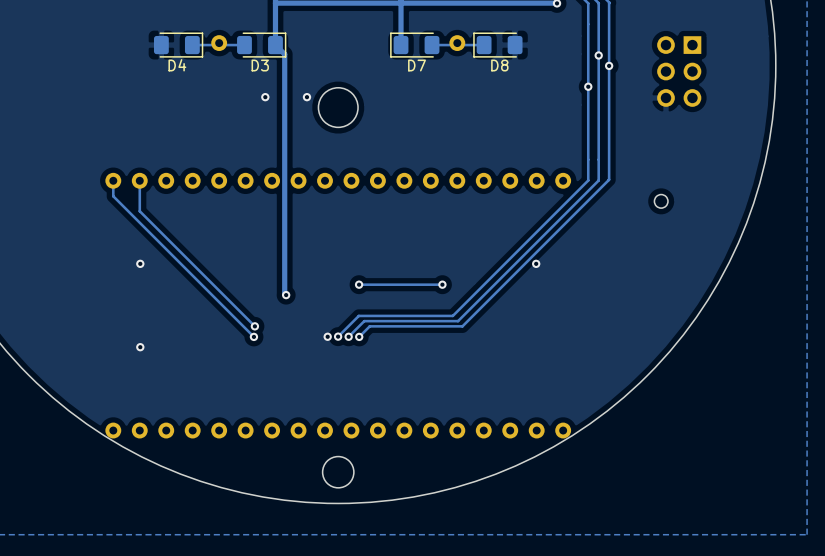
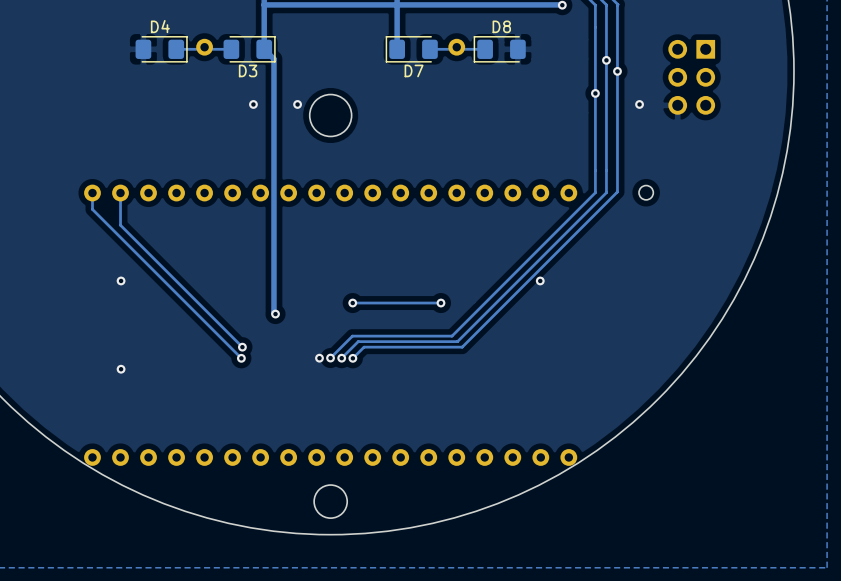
D4 name position: D4 (177, 65) -> D4 (160, 26)
D8 name position: D8 (499, 65) -> D8 (501, 26)
via: none -> (639, 104)
round board edge position: (661, 201) -> (646, 192)

